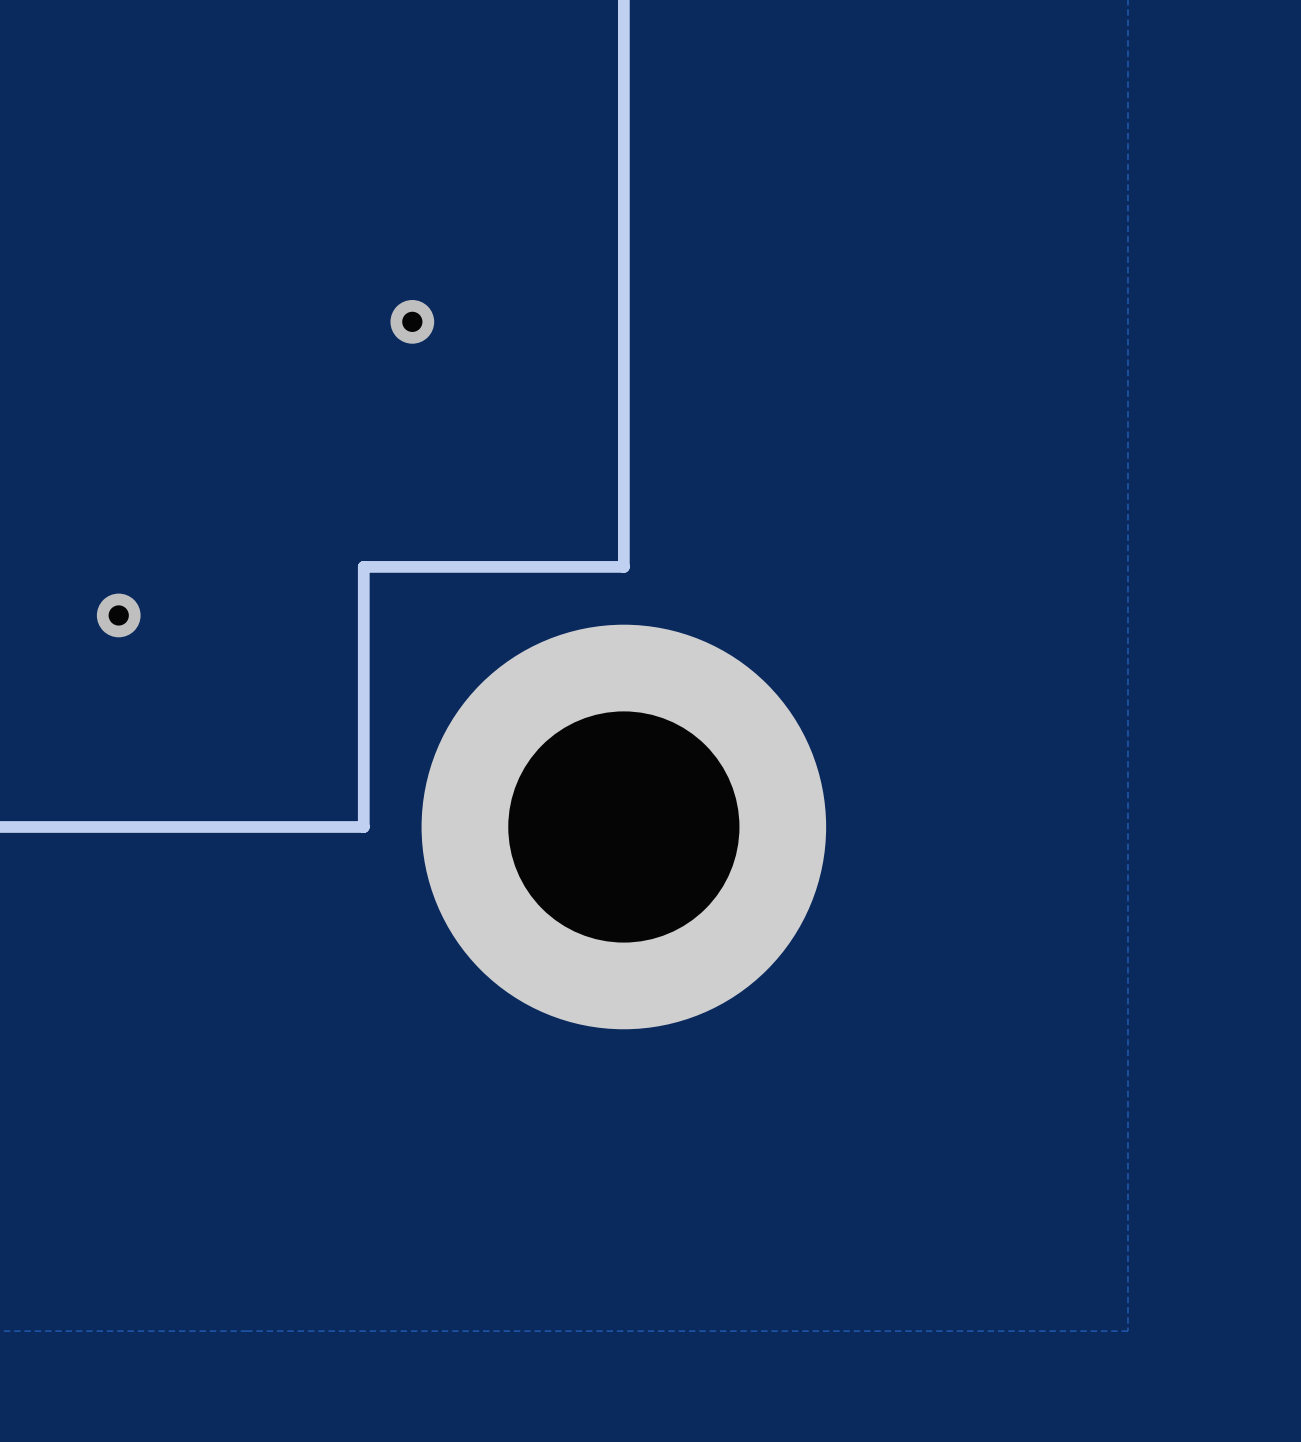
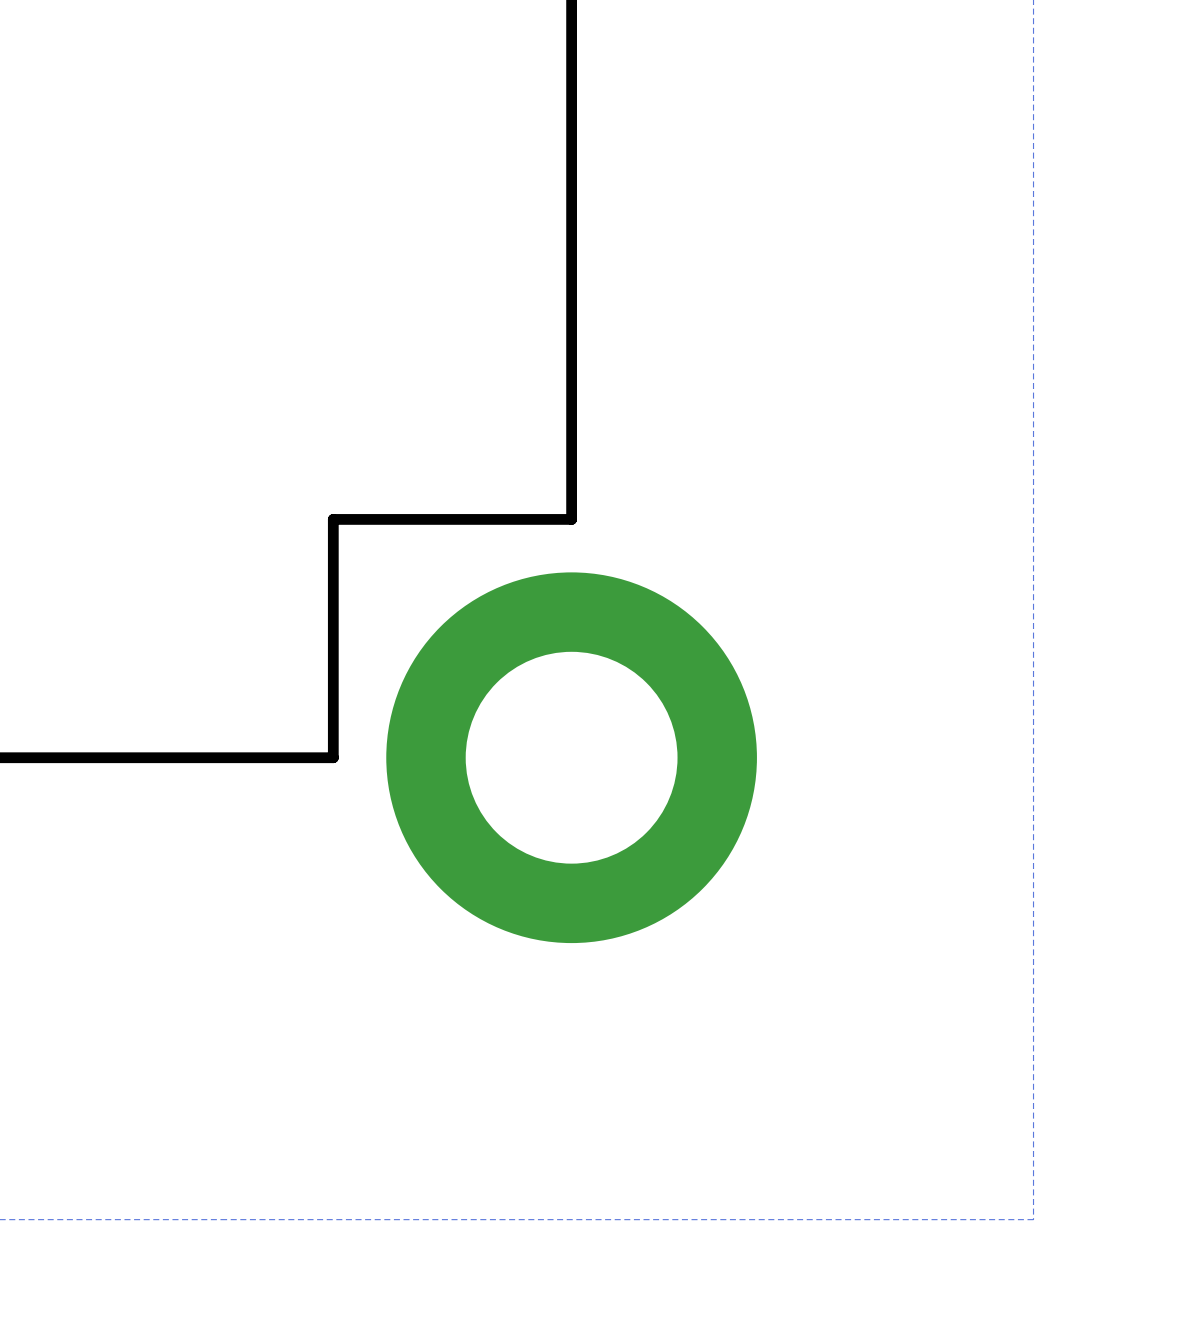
via: (412, 321) -> none
via: (118, 615) -> none

